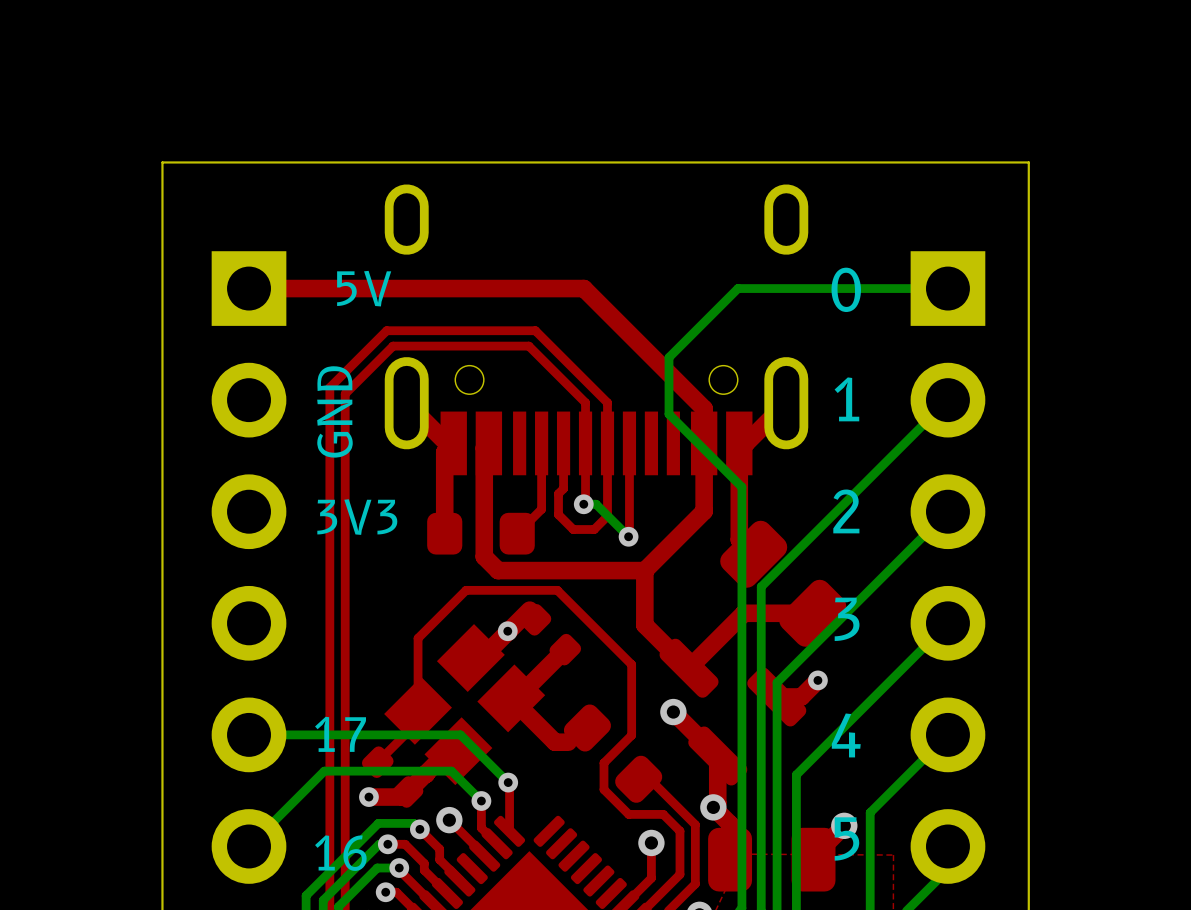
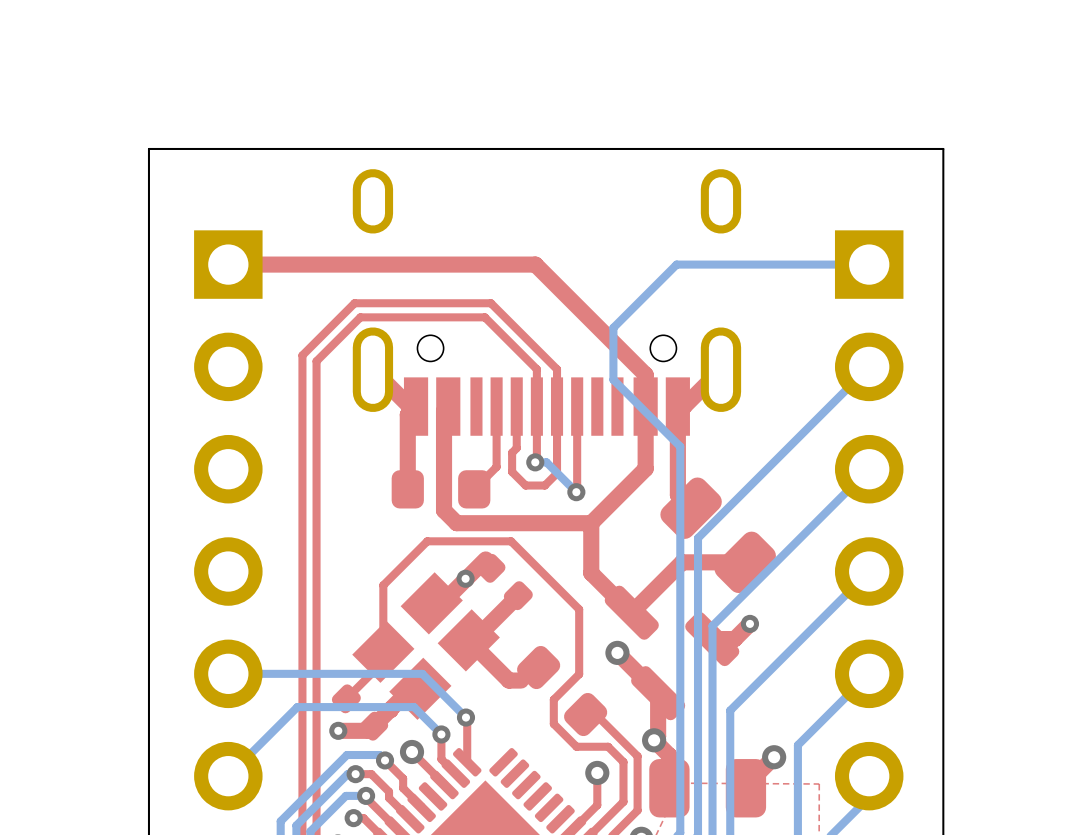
text: 5V (364, 288) -> none
text: 0 (846, 289) -> none
text: 1 (846, 399) -> none
text: GND (334, 411) -> none
text: 2 (846, 511) -> none
text: 3V3 (357, 517) -> none
text: 3 (847, 619) -> none
text: 17 (340, 734) -> none
text: 4 (846, 735) -> none
text: 5 (846, 838) -> none
text: 16 (340, 853) -> none

